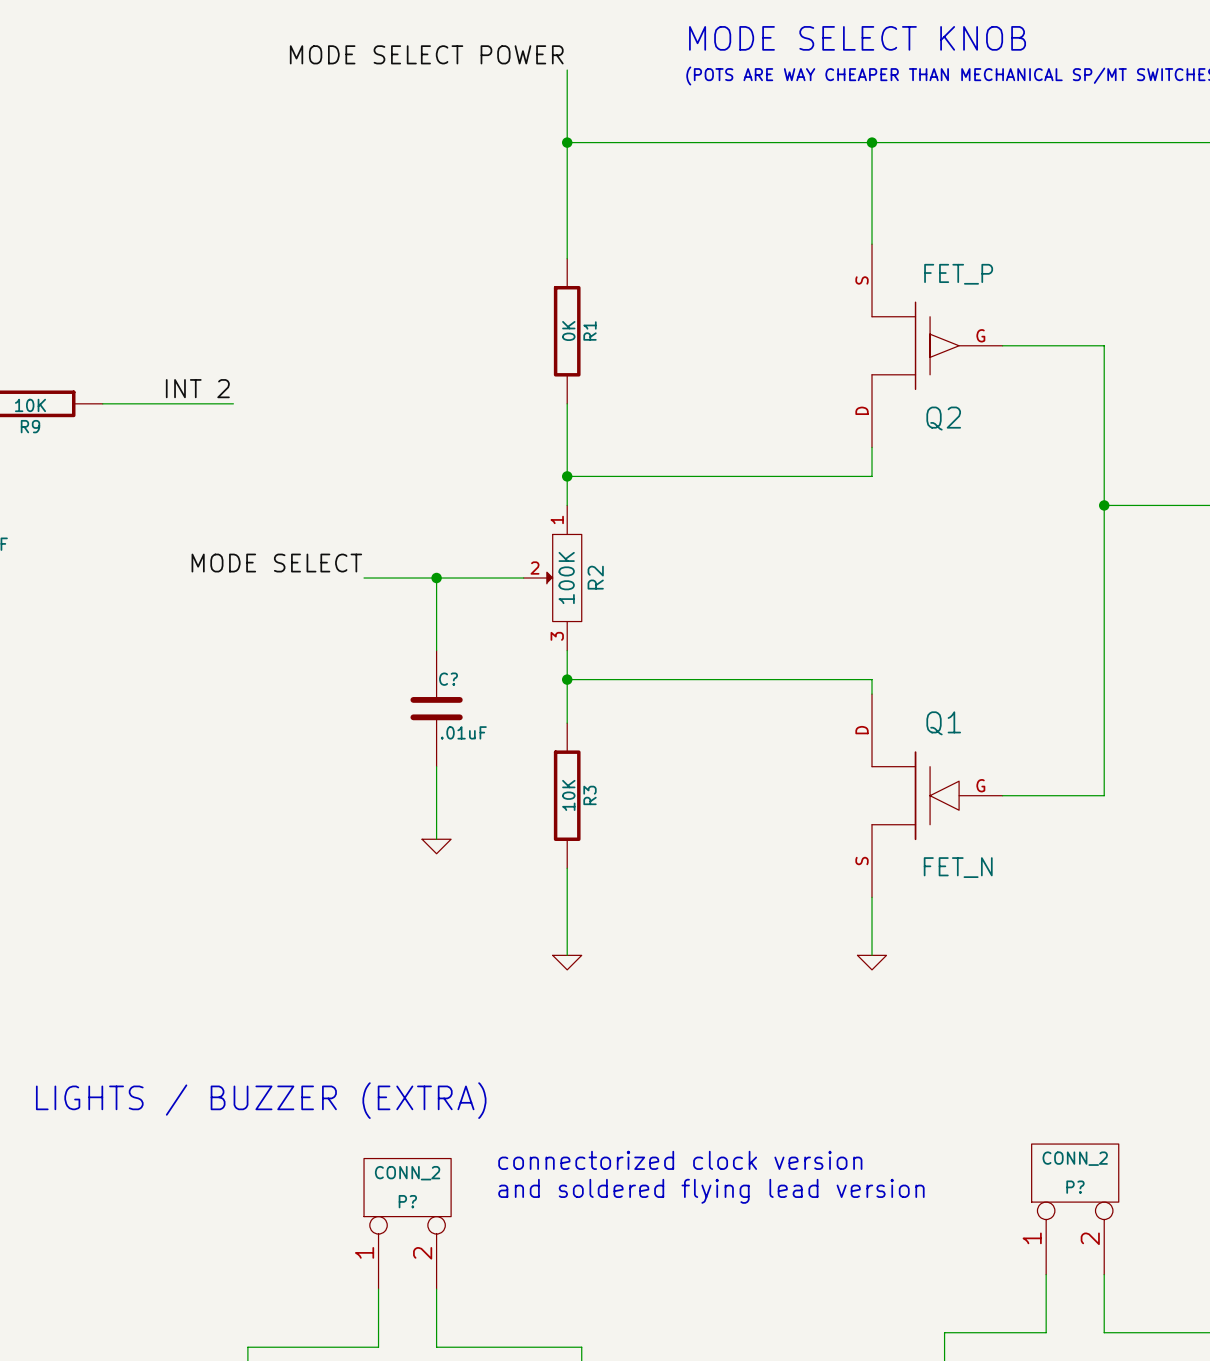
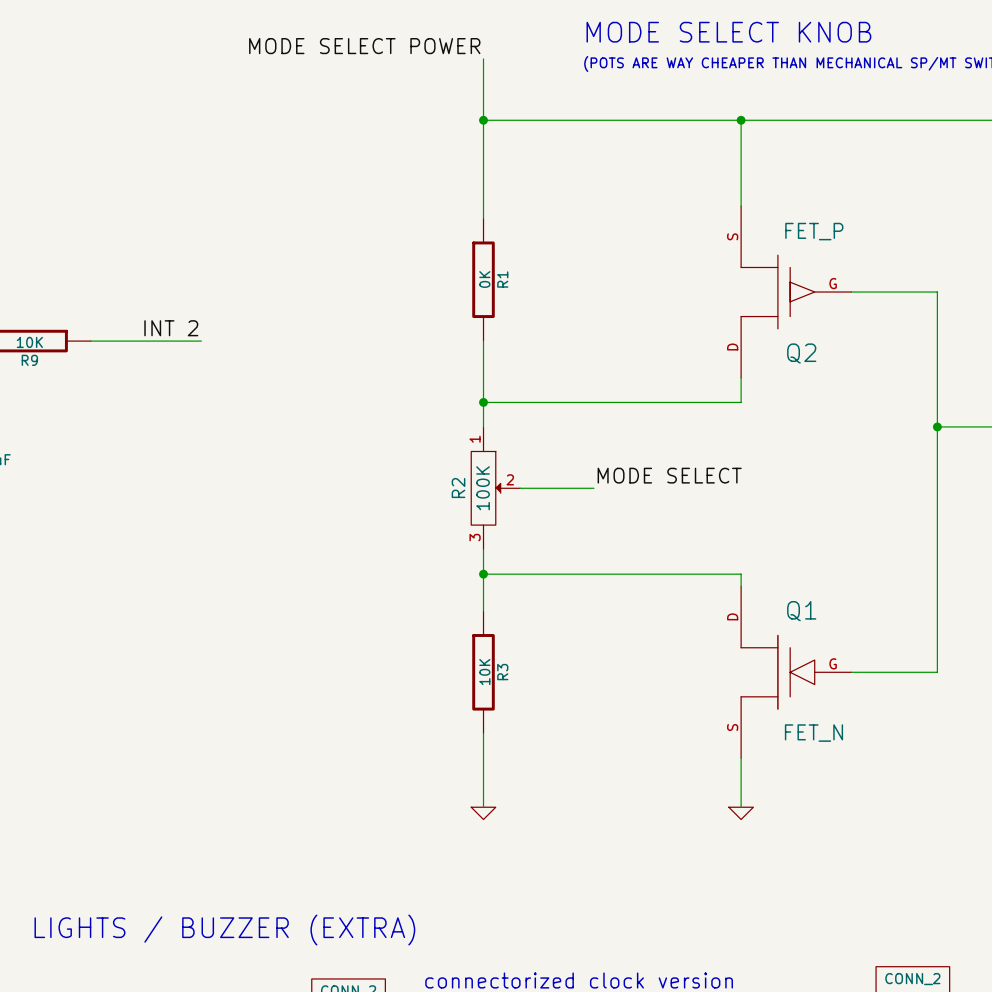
label: MODE SELECT (276, 563) -> none
label: none -> MODE SELECT (669, 475)
wire: (364, 578) (523, 578) -> none
wire: (436, 578) (436, 650) -> none
junction: (436, 578) -> none
R2 flip: as is (564, 578) -> left-right (485, 488)
wire: none -> (520, 488) (593, 488)
C?: .01uF (436, 708) -> none
wire: (436, 766) (436, 839) -> none
power symbol: (436, 846) -> none

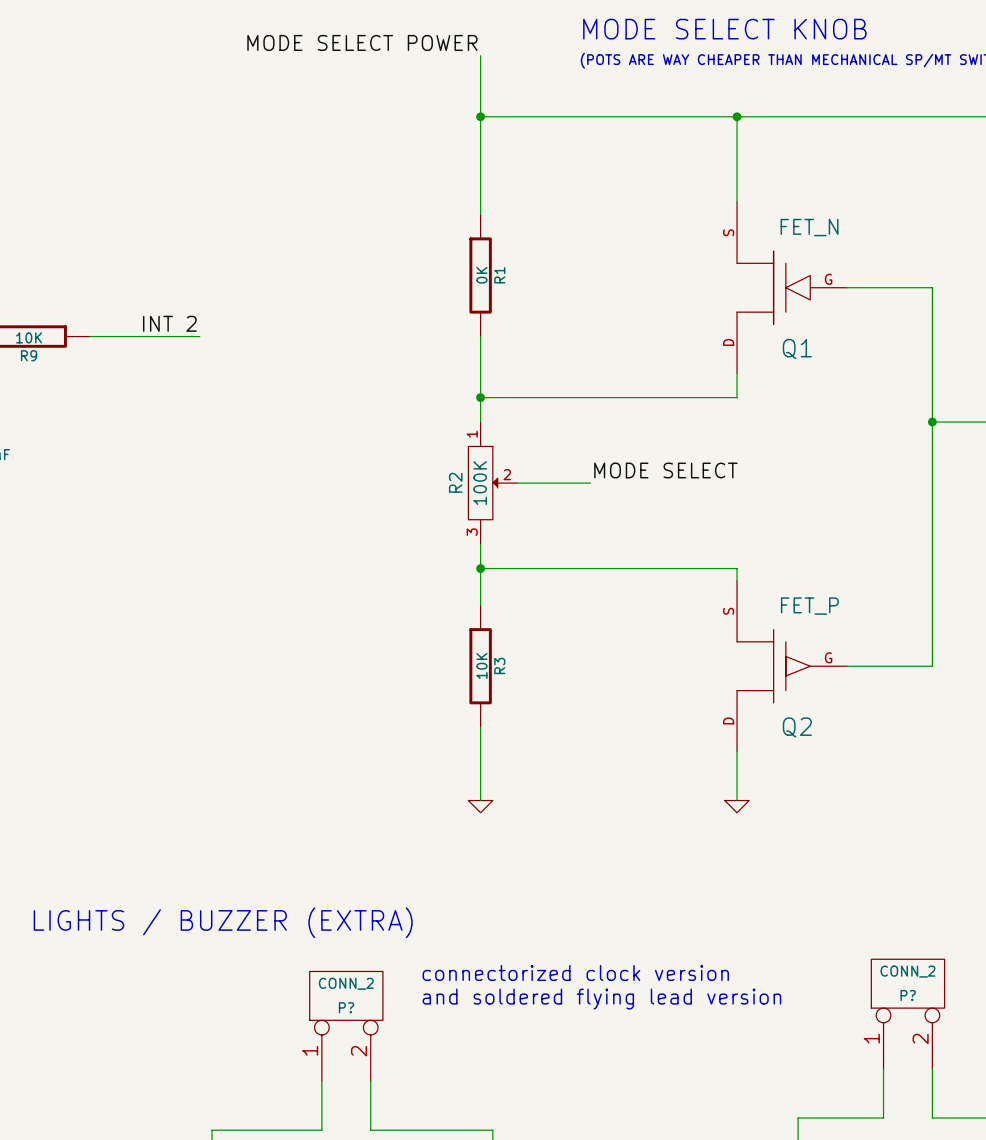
Q2 position: (796, 292) -> (791, 666)
Q1 flip: as is (777, 672) -> up-down (773, 287)
Q1 position: (796, 672) -> (791, 287)

